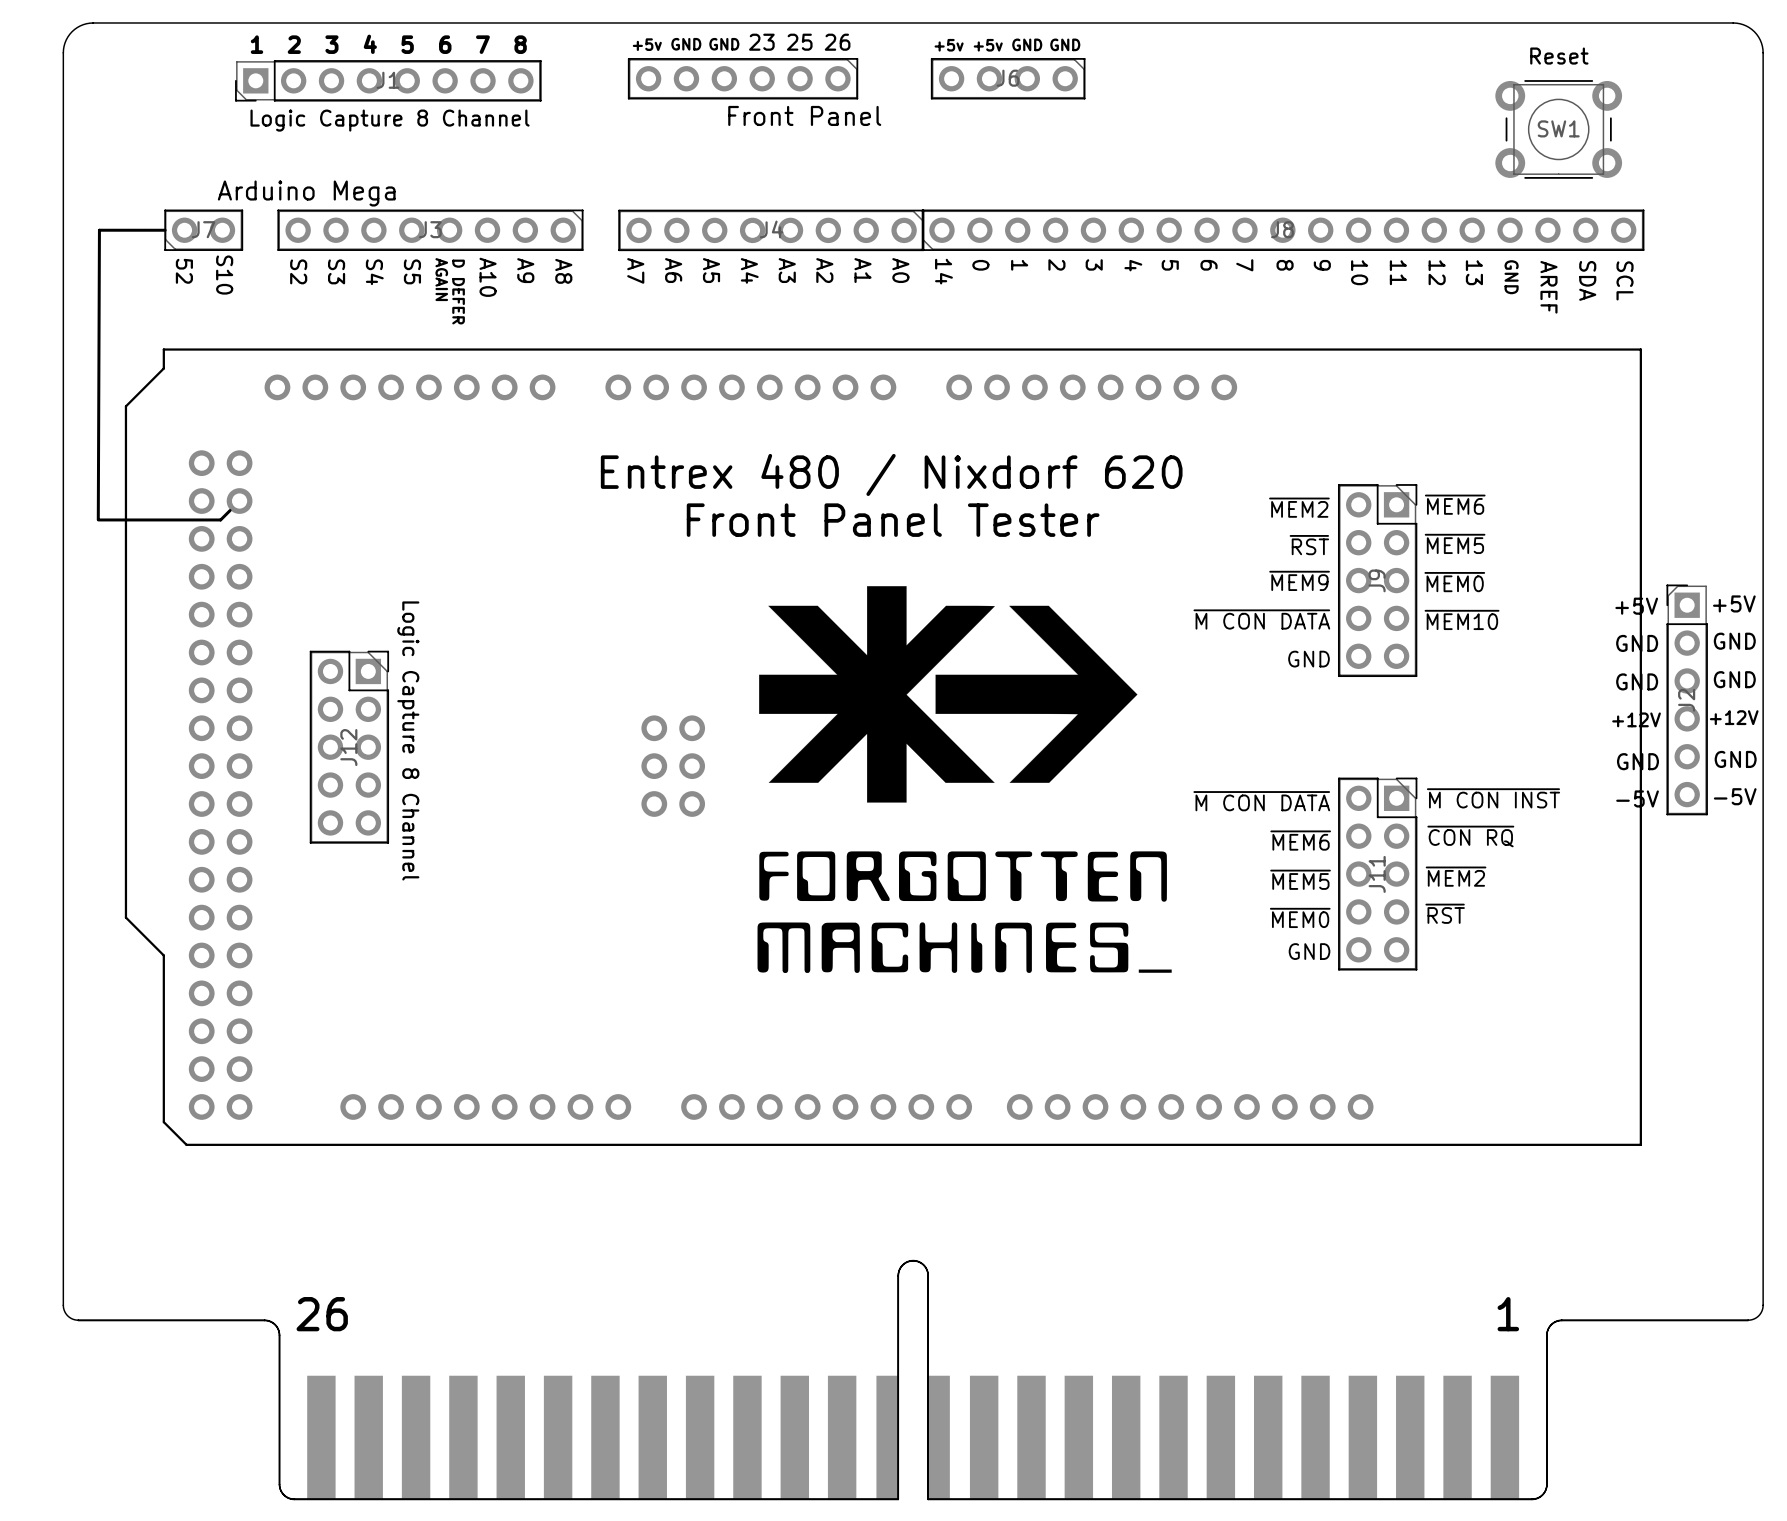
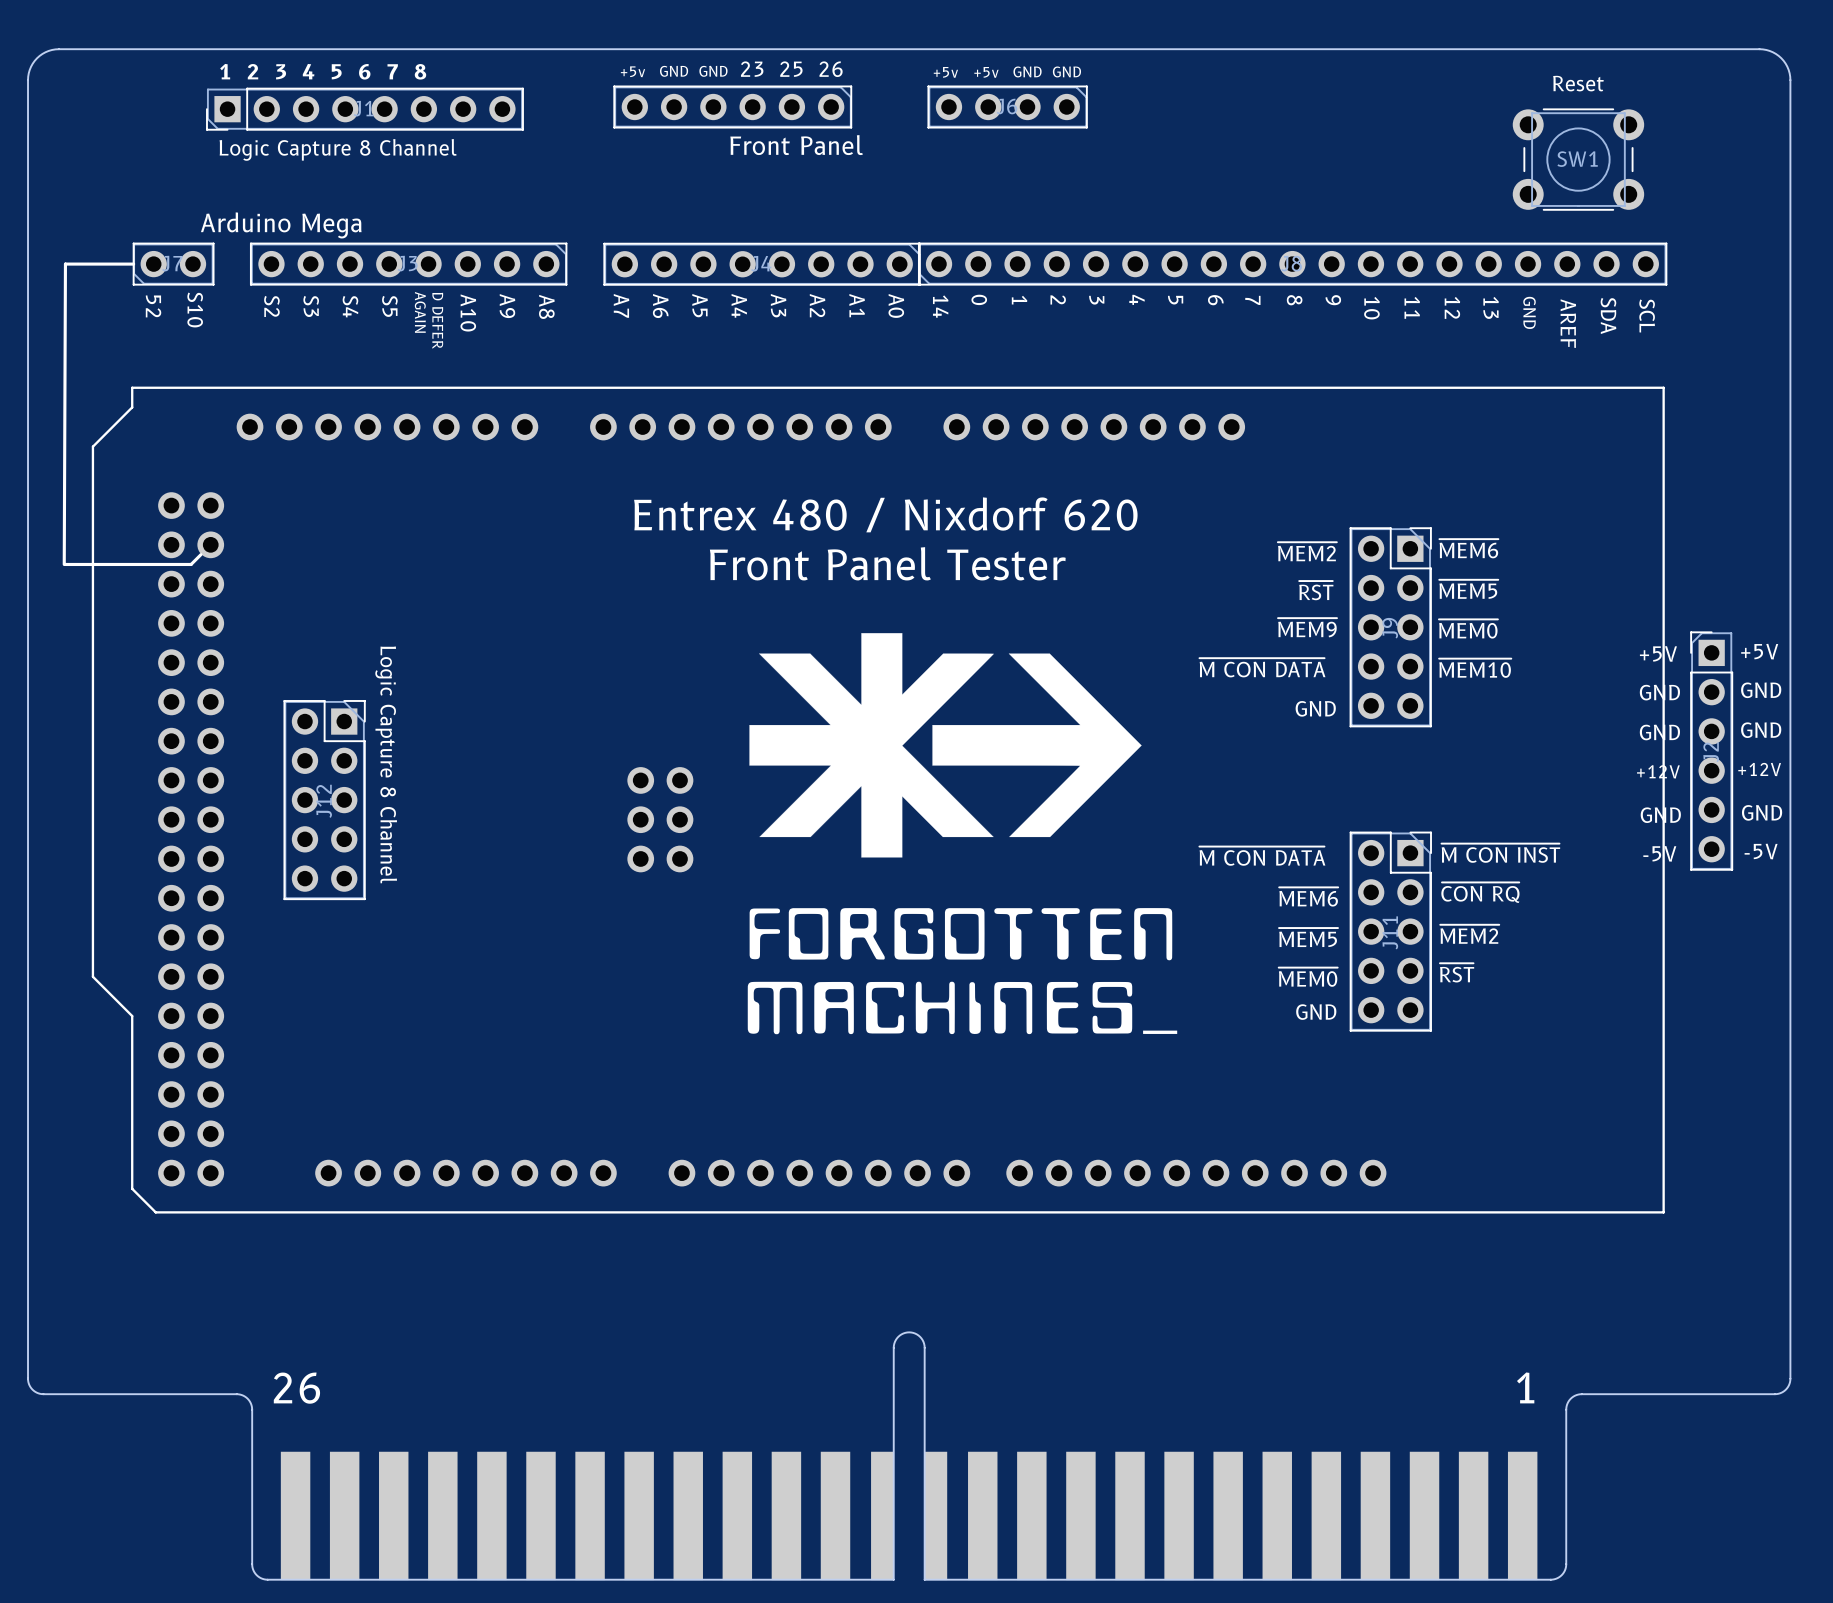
part: (913, 1380) -> none
part: none -> (909, 1515)

